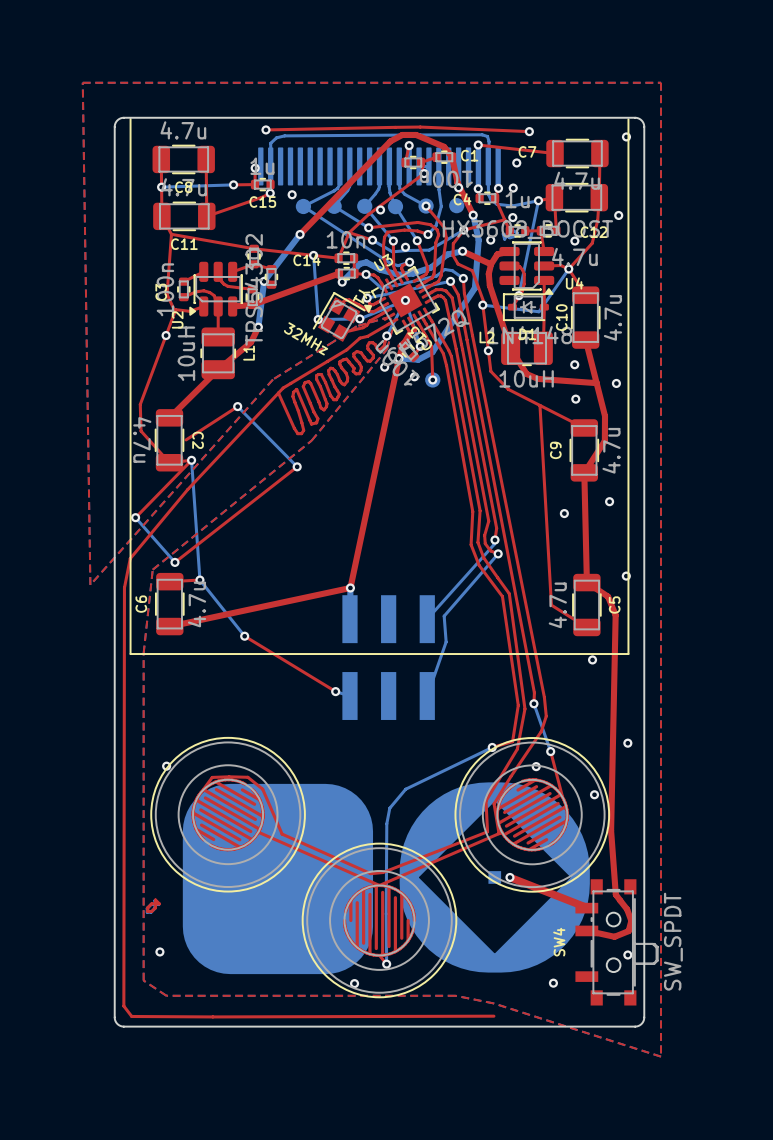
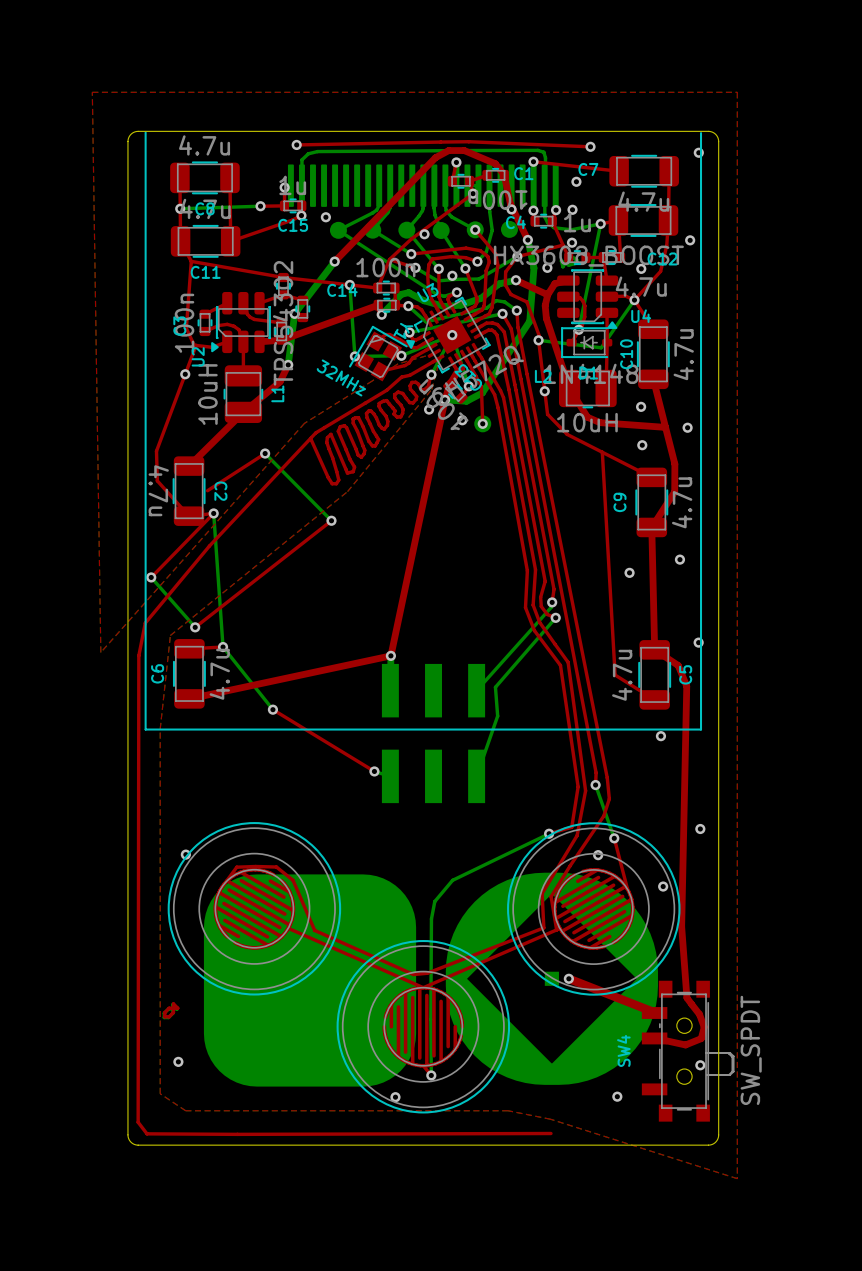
C14 value: 10n (345, 239) -> 100n (385, 267)

